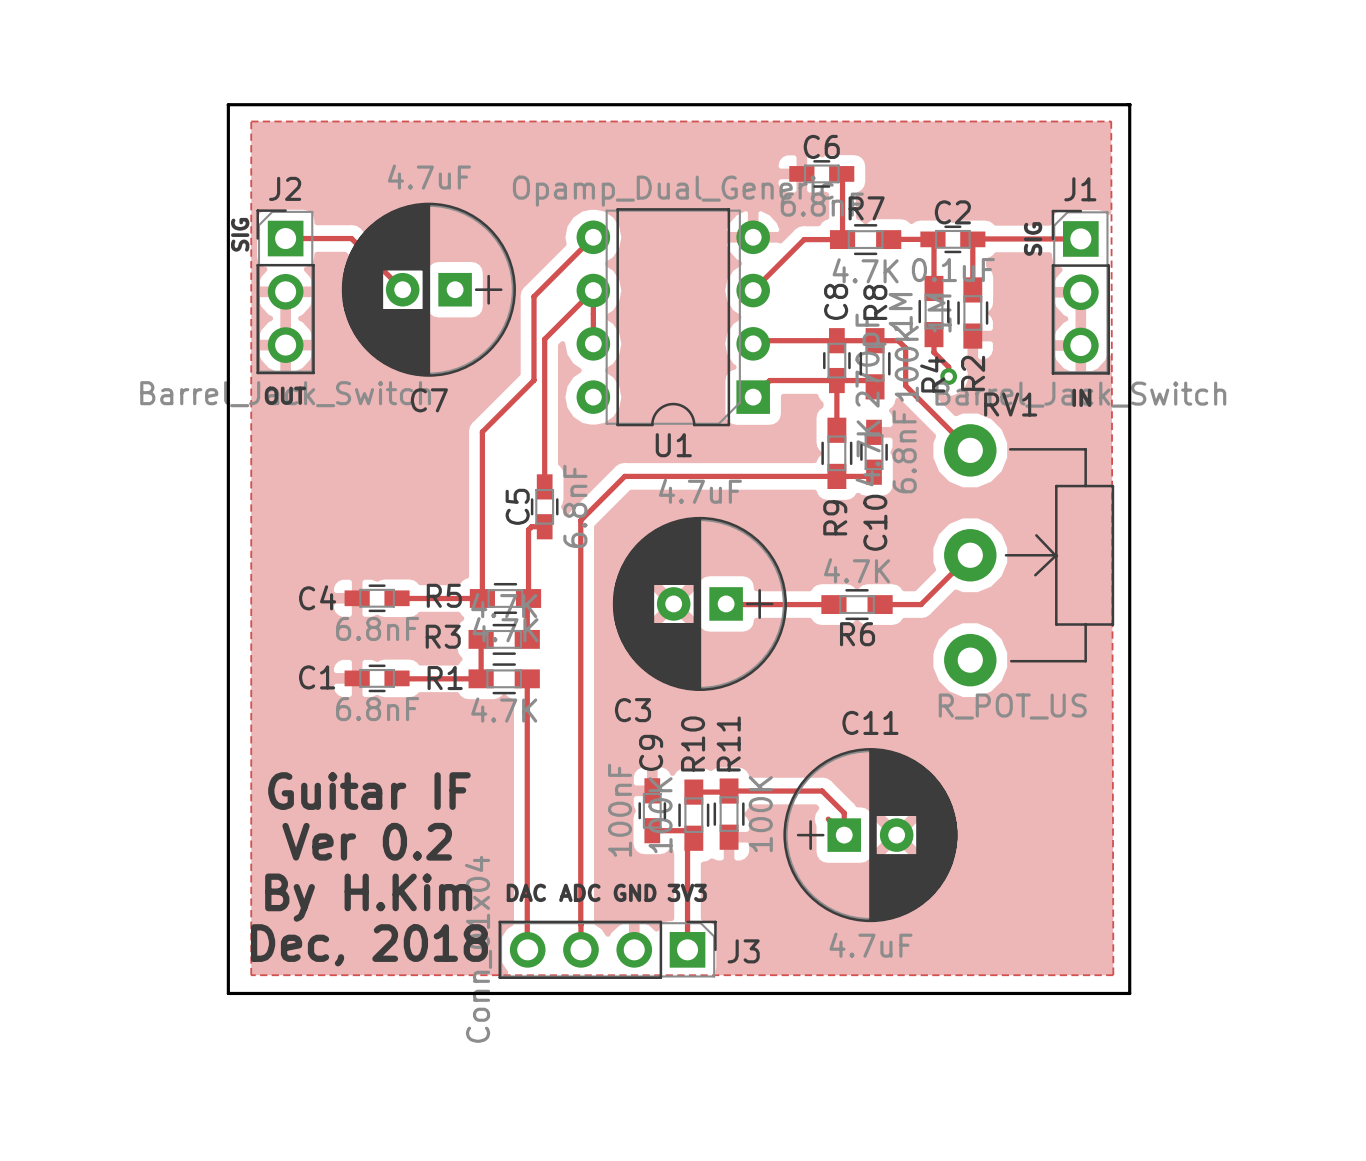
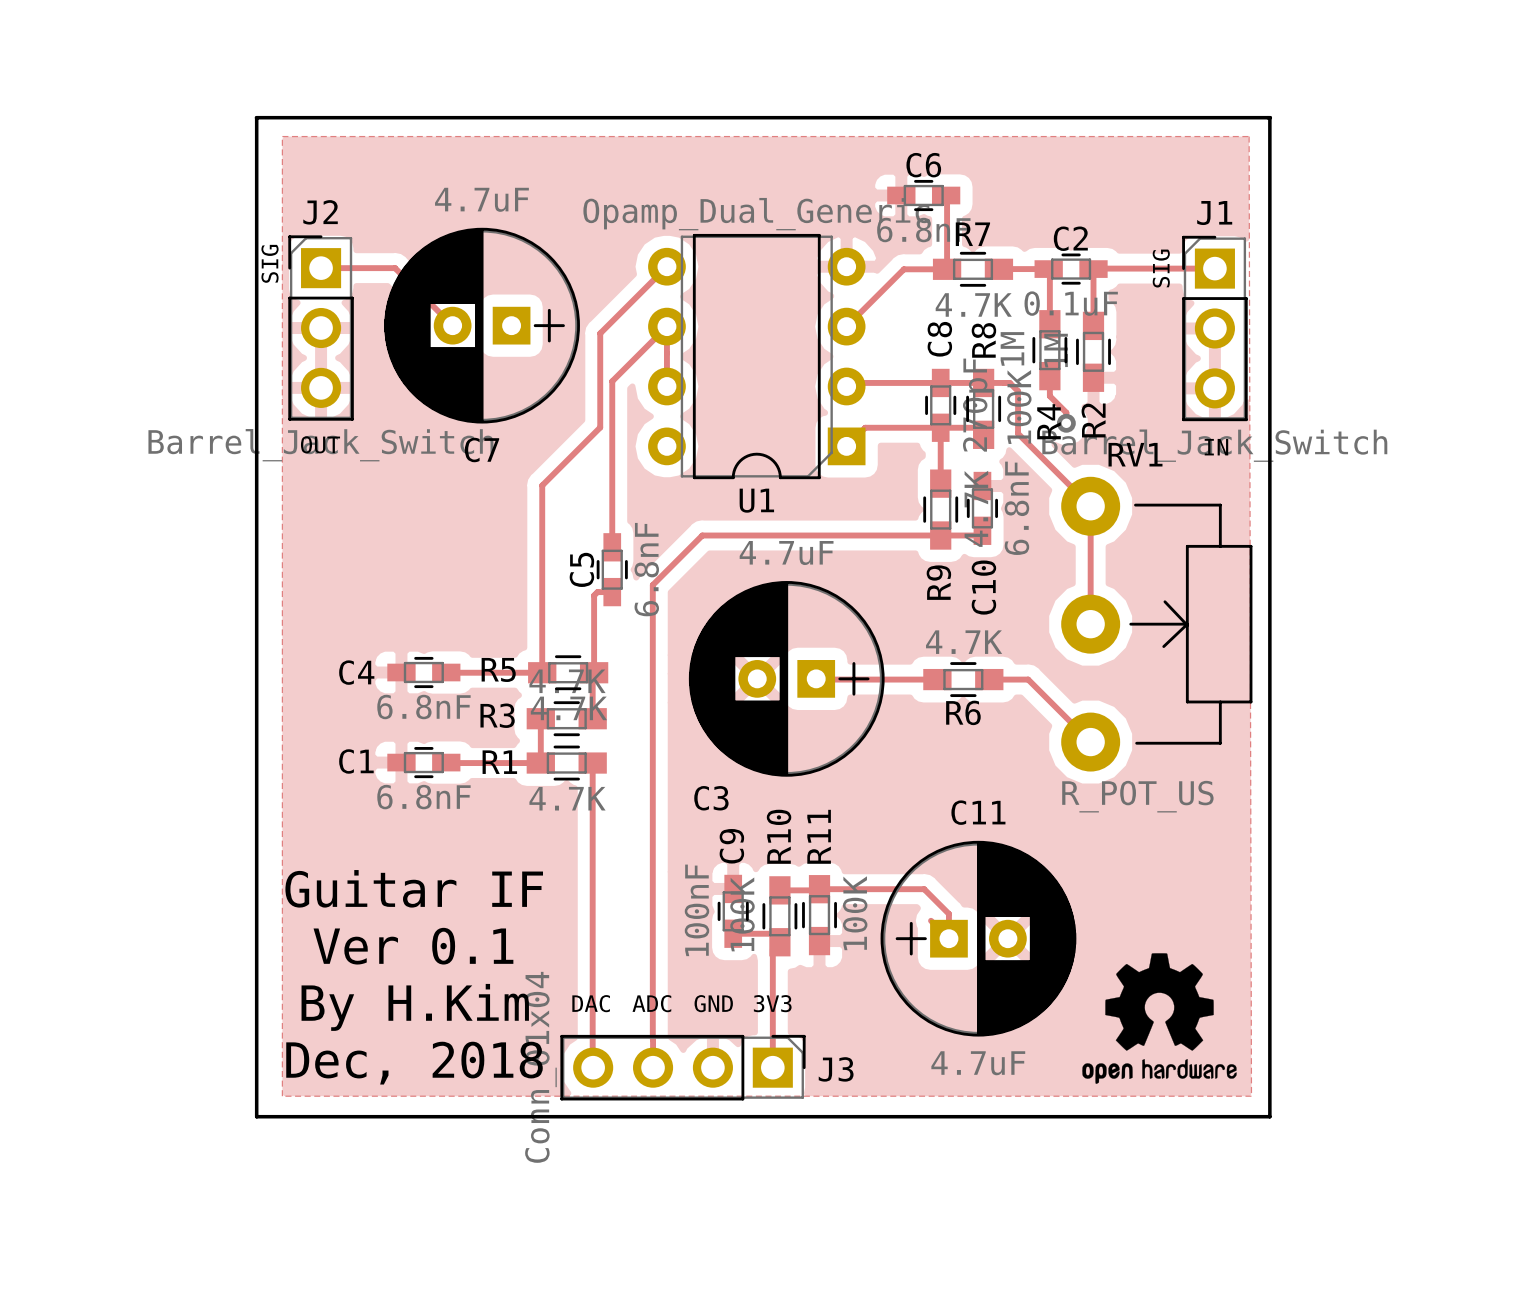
track: none -> (1090, 506) (1090, 624)
track: (970, 555) (921, 604) (914, 604) -> (1090, 742) (1028, 679)
text: Ver 0.2 (367, 841) -> Ver 0.1 (413, 946)
drawing: none -> [1082, 953, 1237, 1084]

